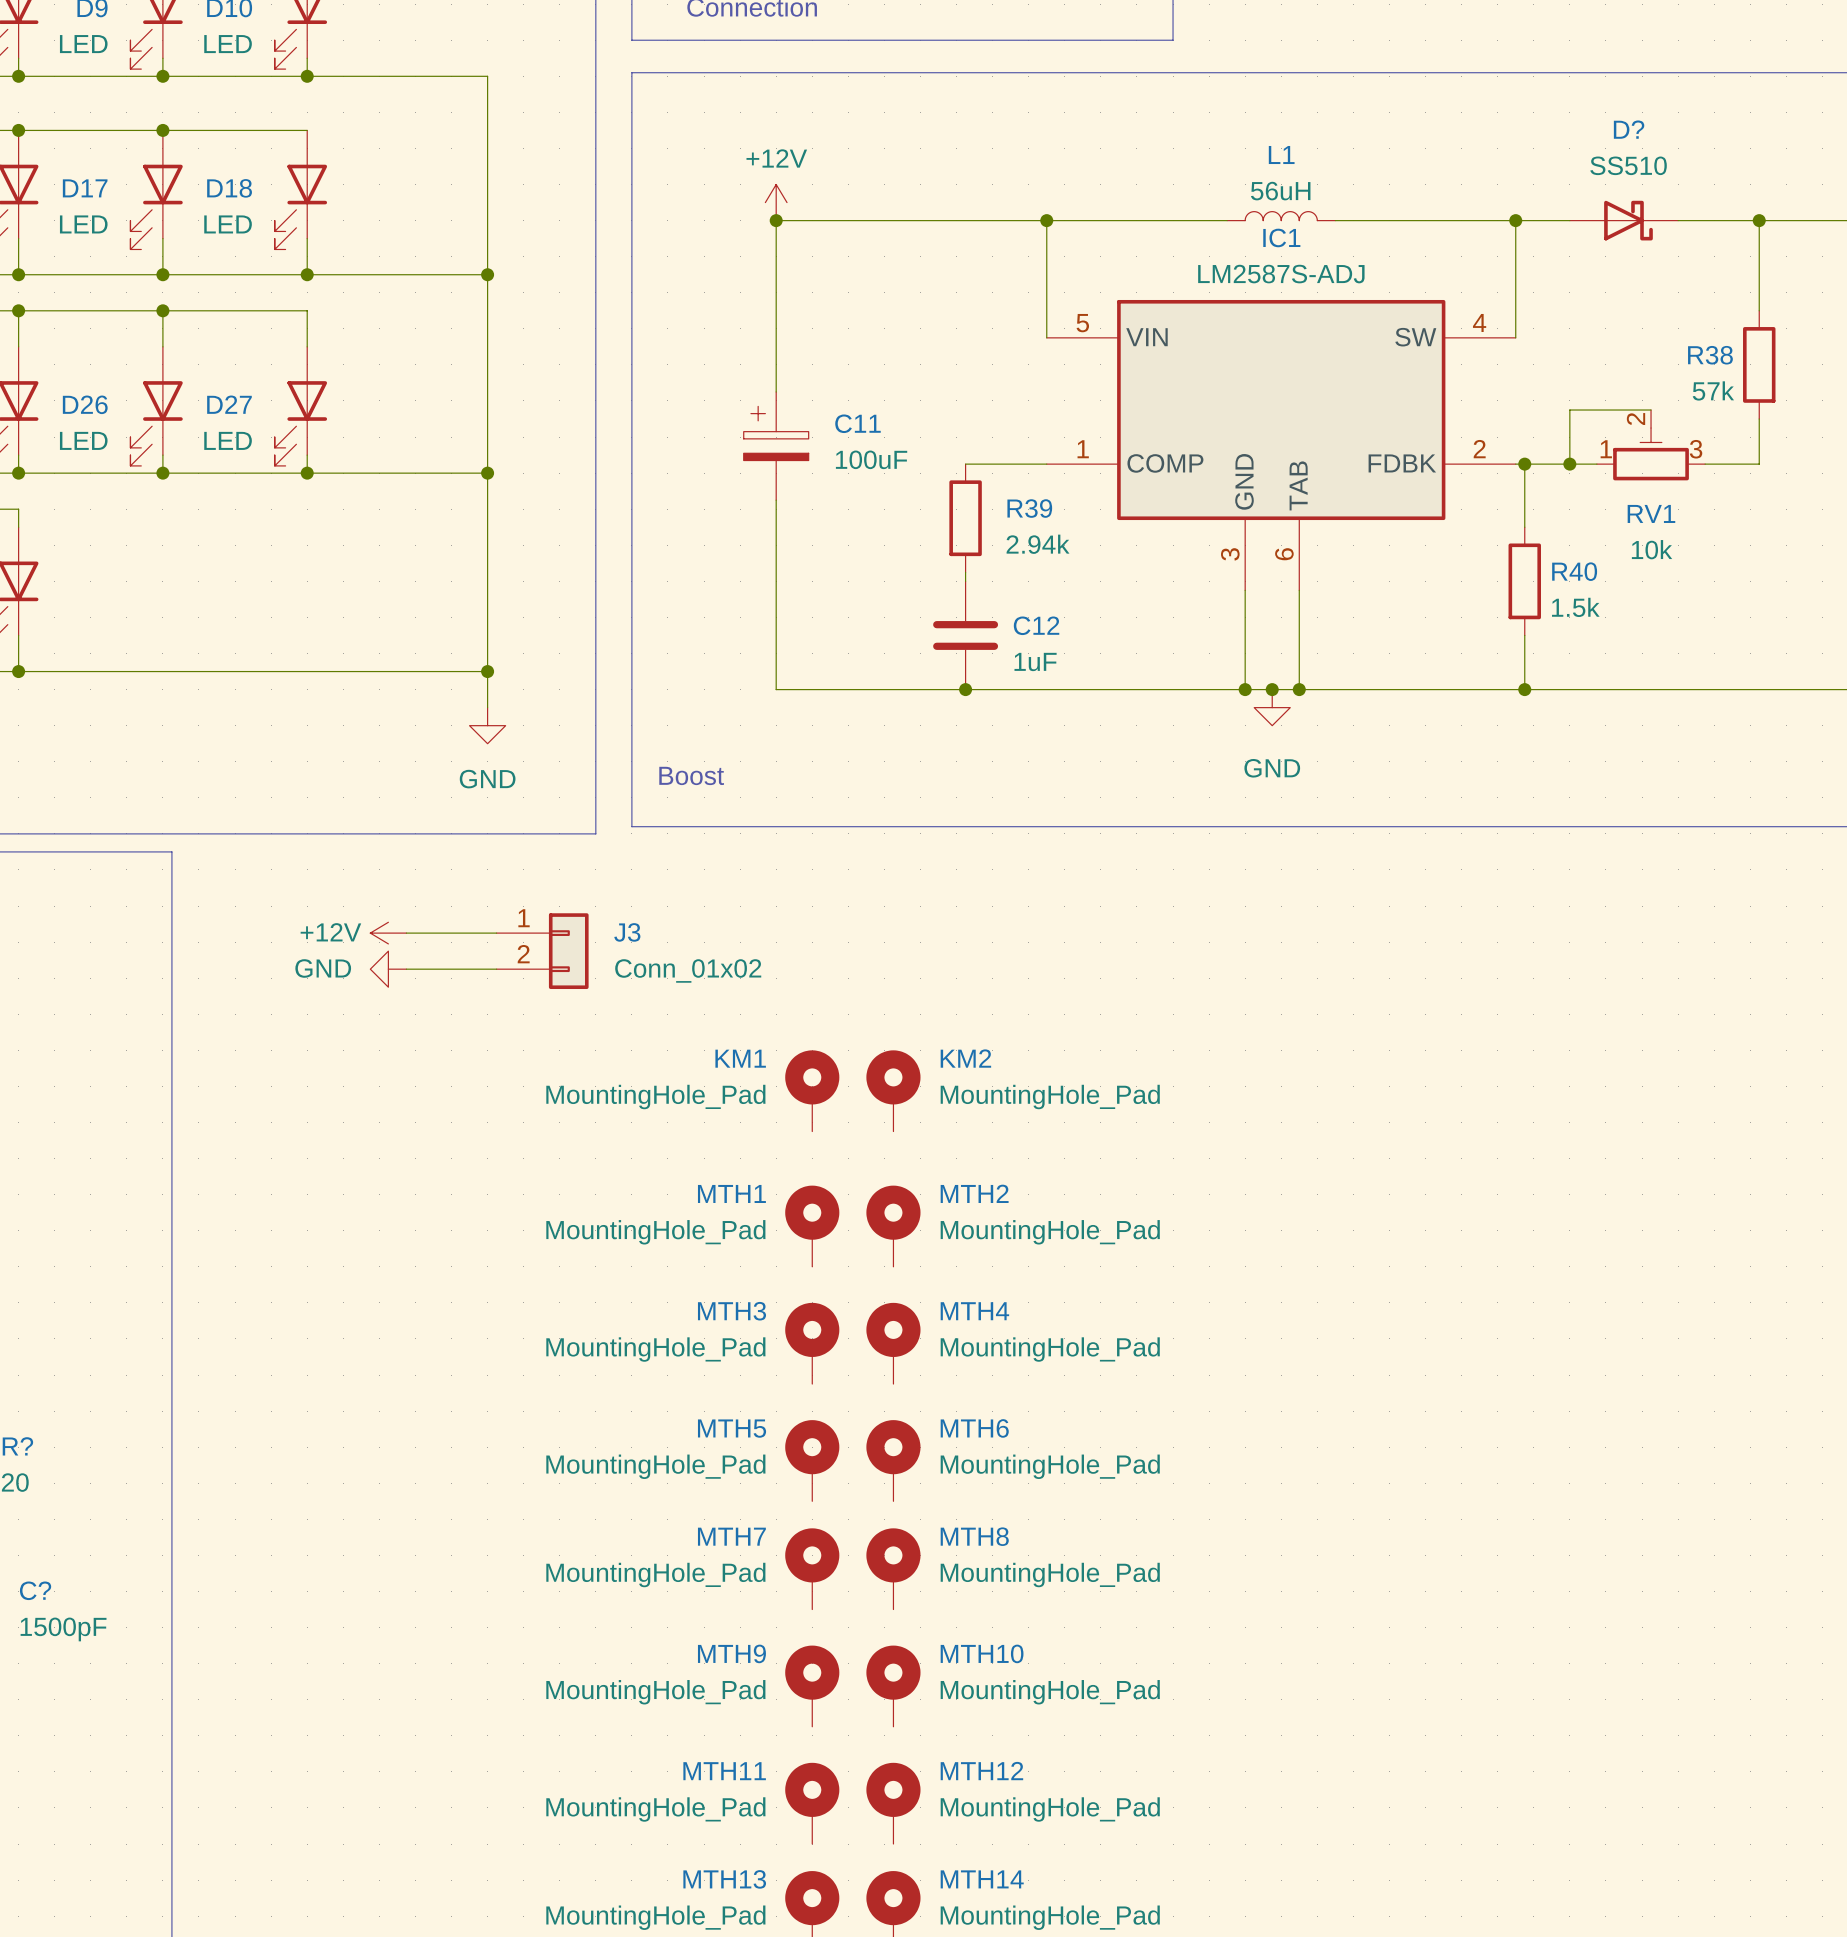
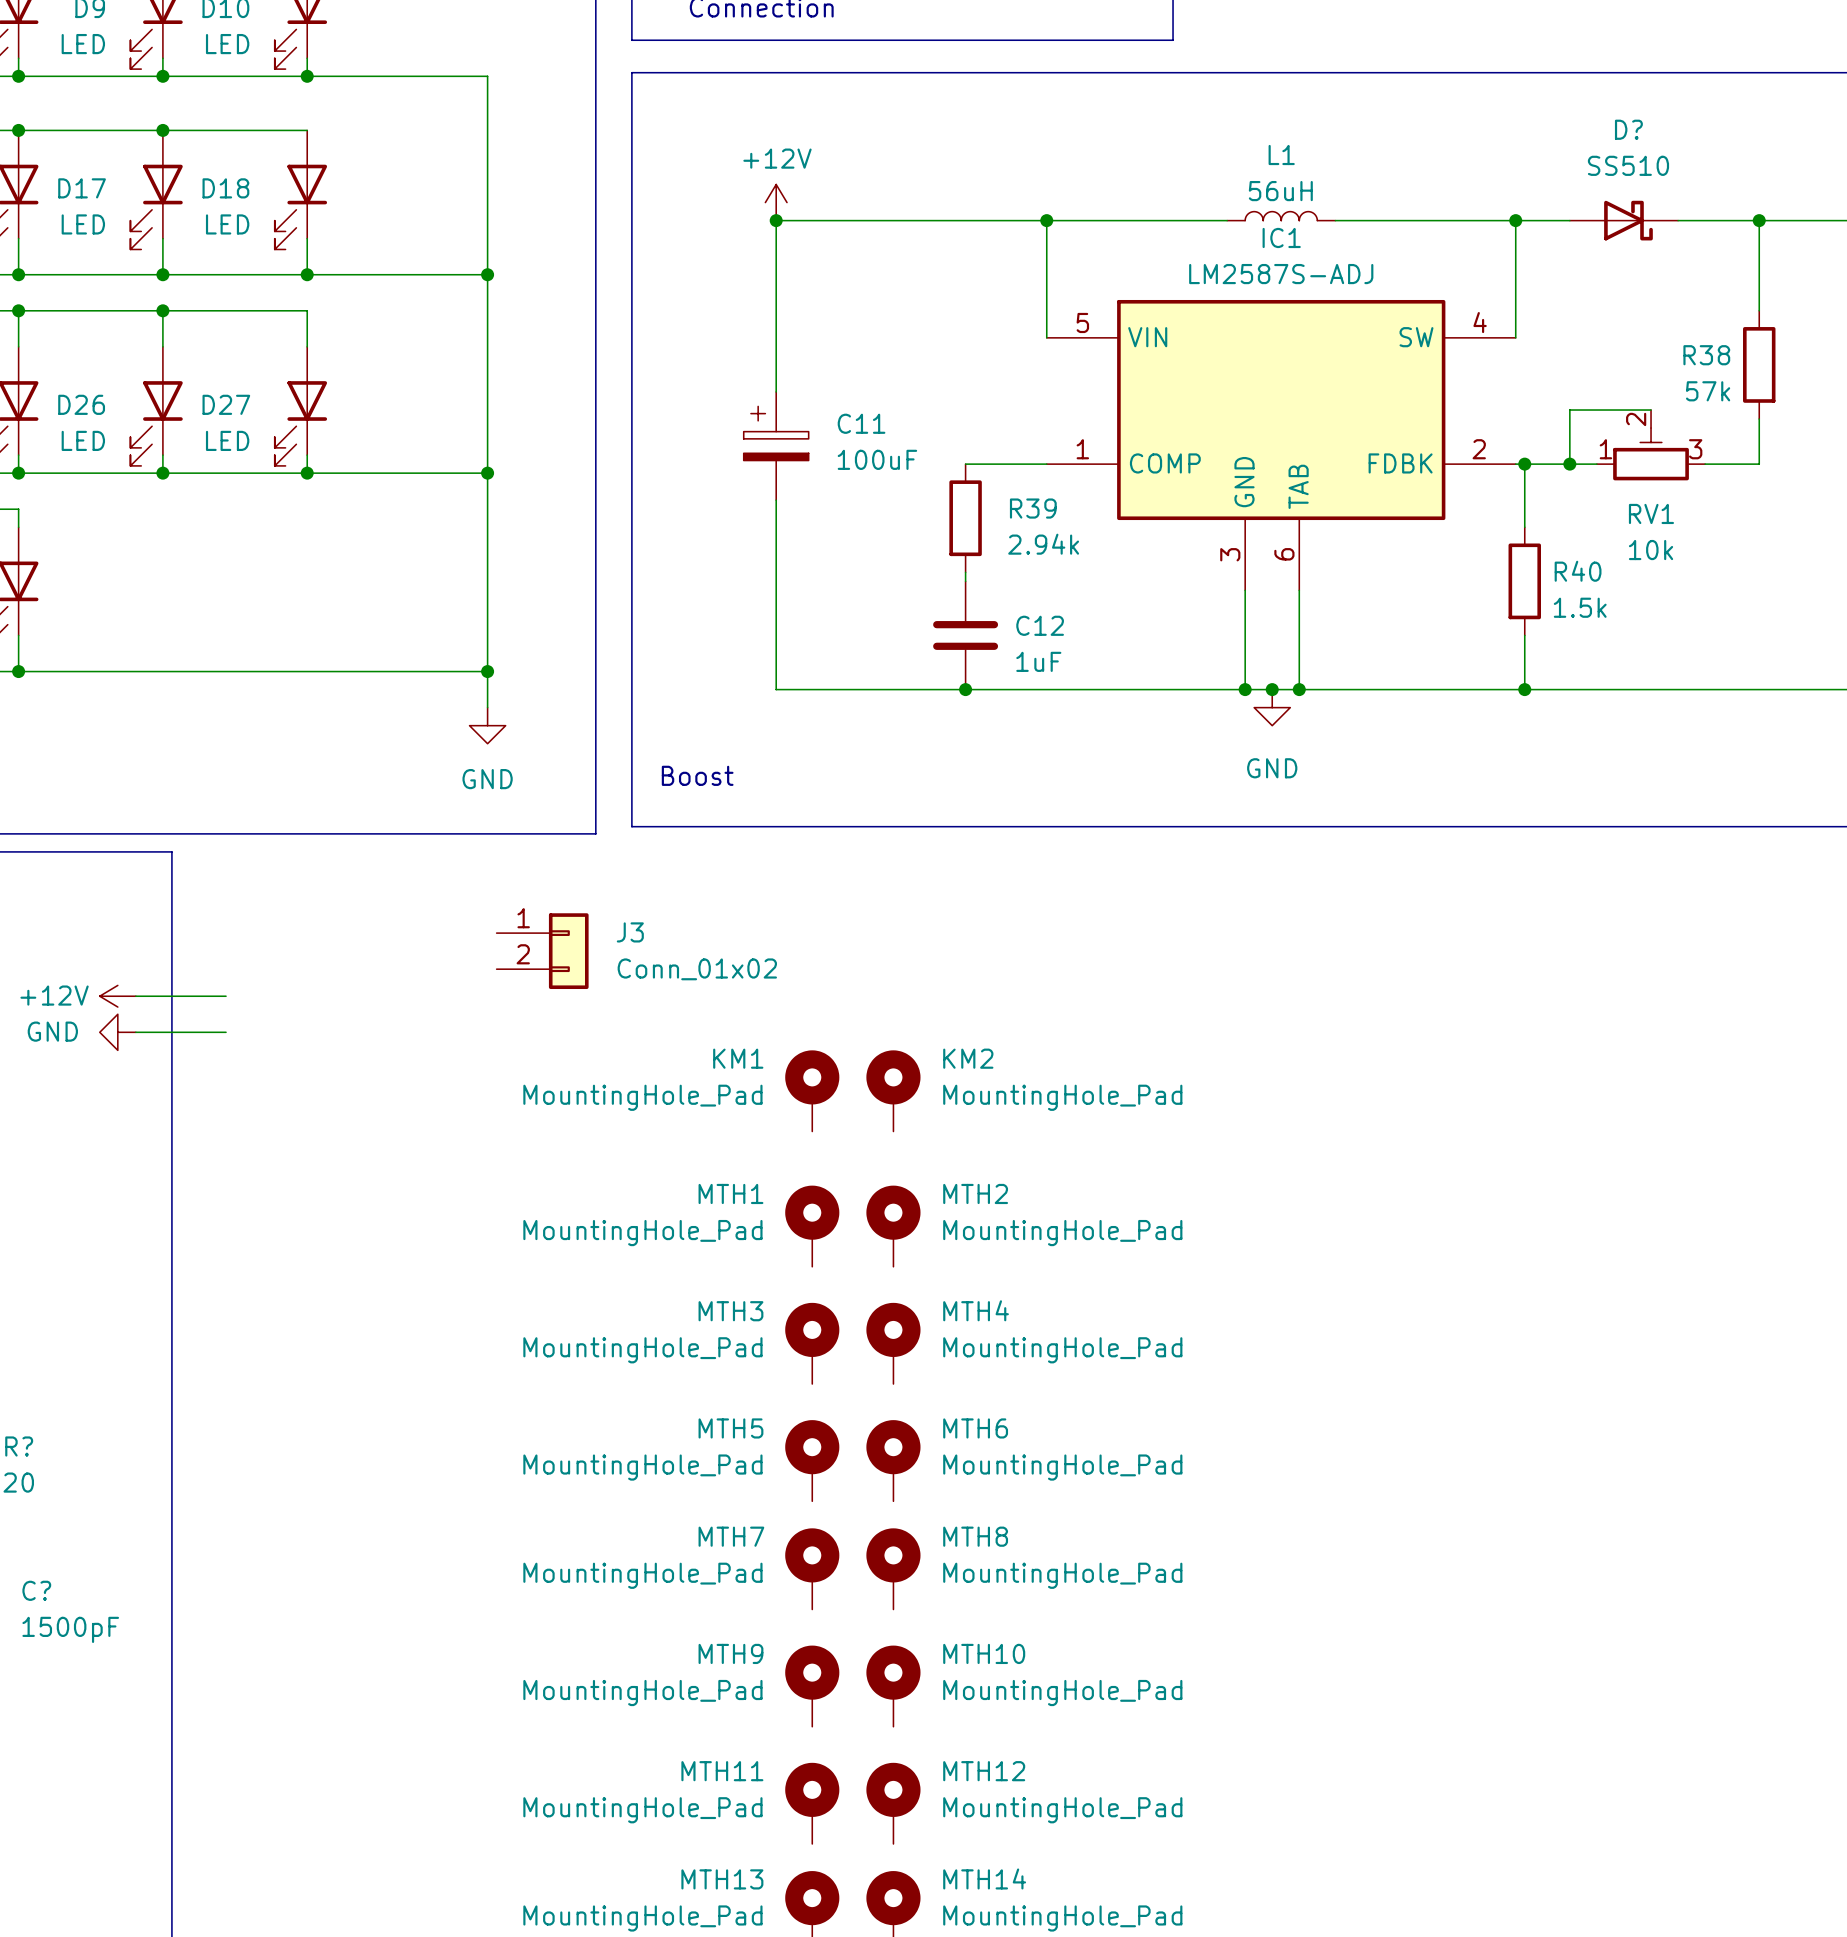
power symbol position: +12V (388, 933) -> +12V (117, 996)
wire: (406, 933) (496, 933) -> (135, 996) (226, 996)
power symbol position: GND (388, 969) -> GND (117, 1032)
wire: (406, 969) (496, 969) -> (135, 1032) (226, 1032)

